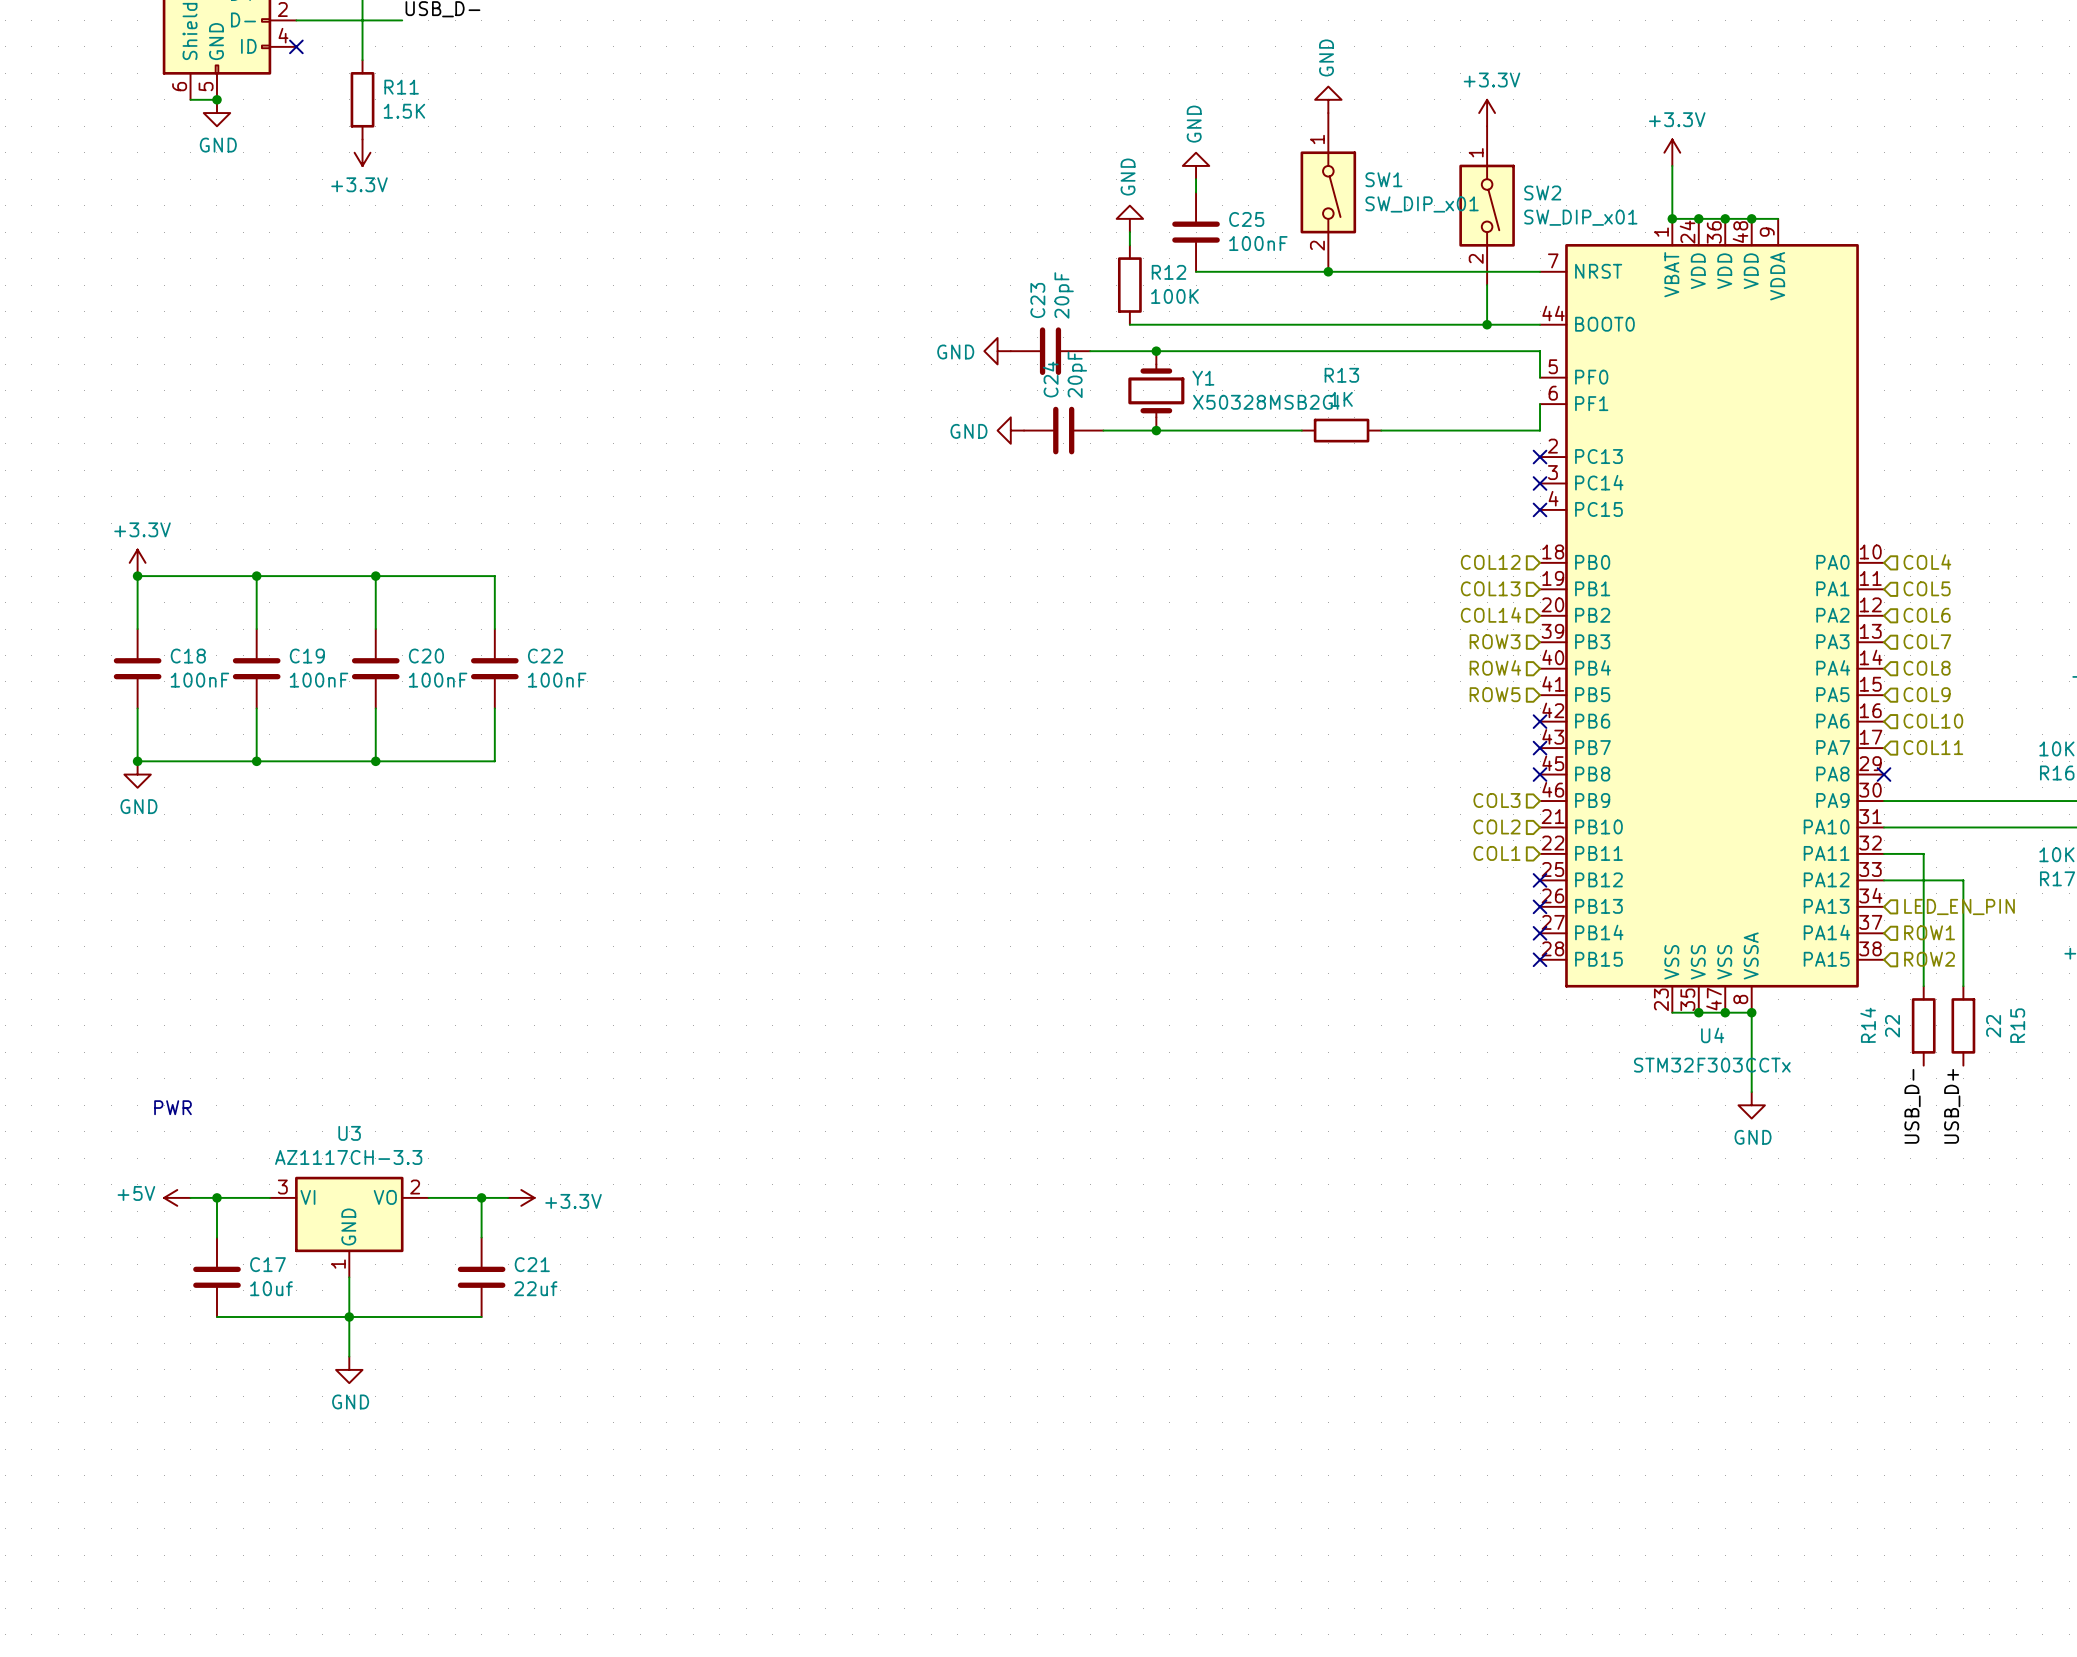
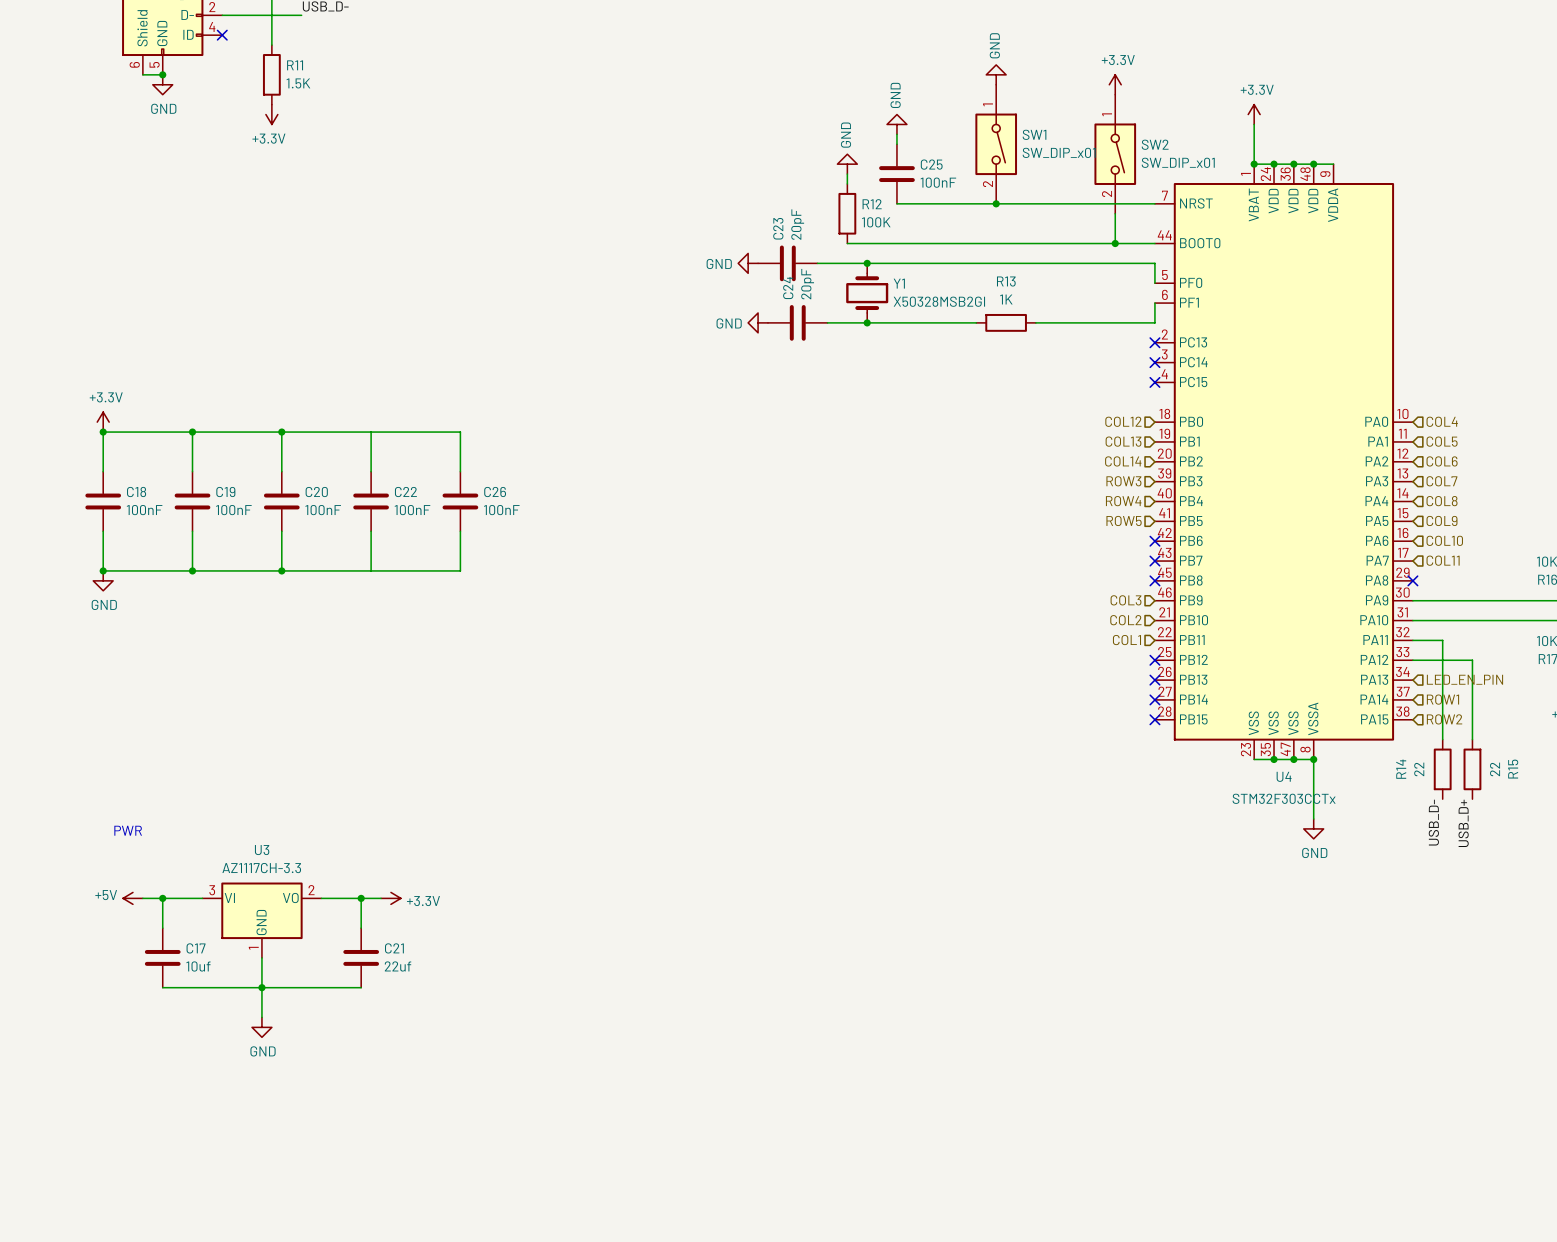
wire: none -> (371, 432) (460, 432) (460, 471)
C26: none -> 100nF (460, 501)
wire: none -> (460, 531) (460, 570) (371, 570)

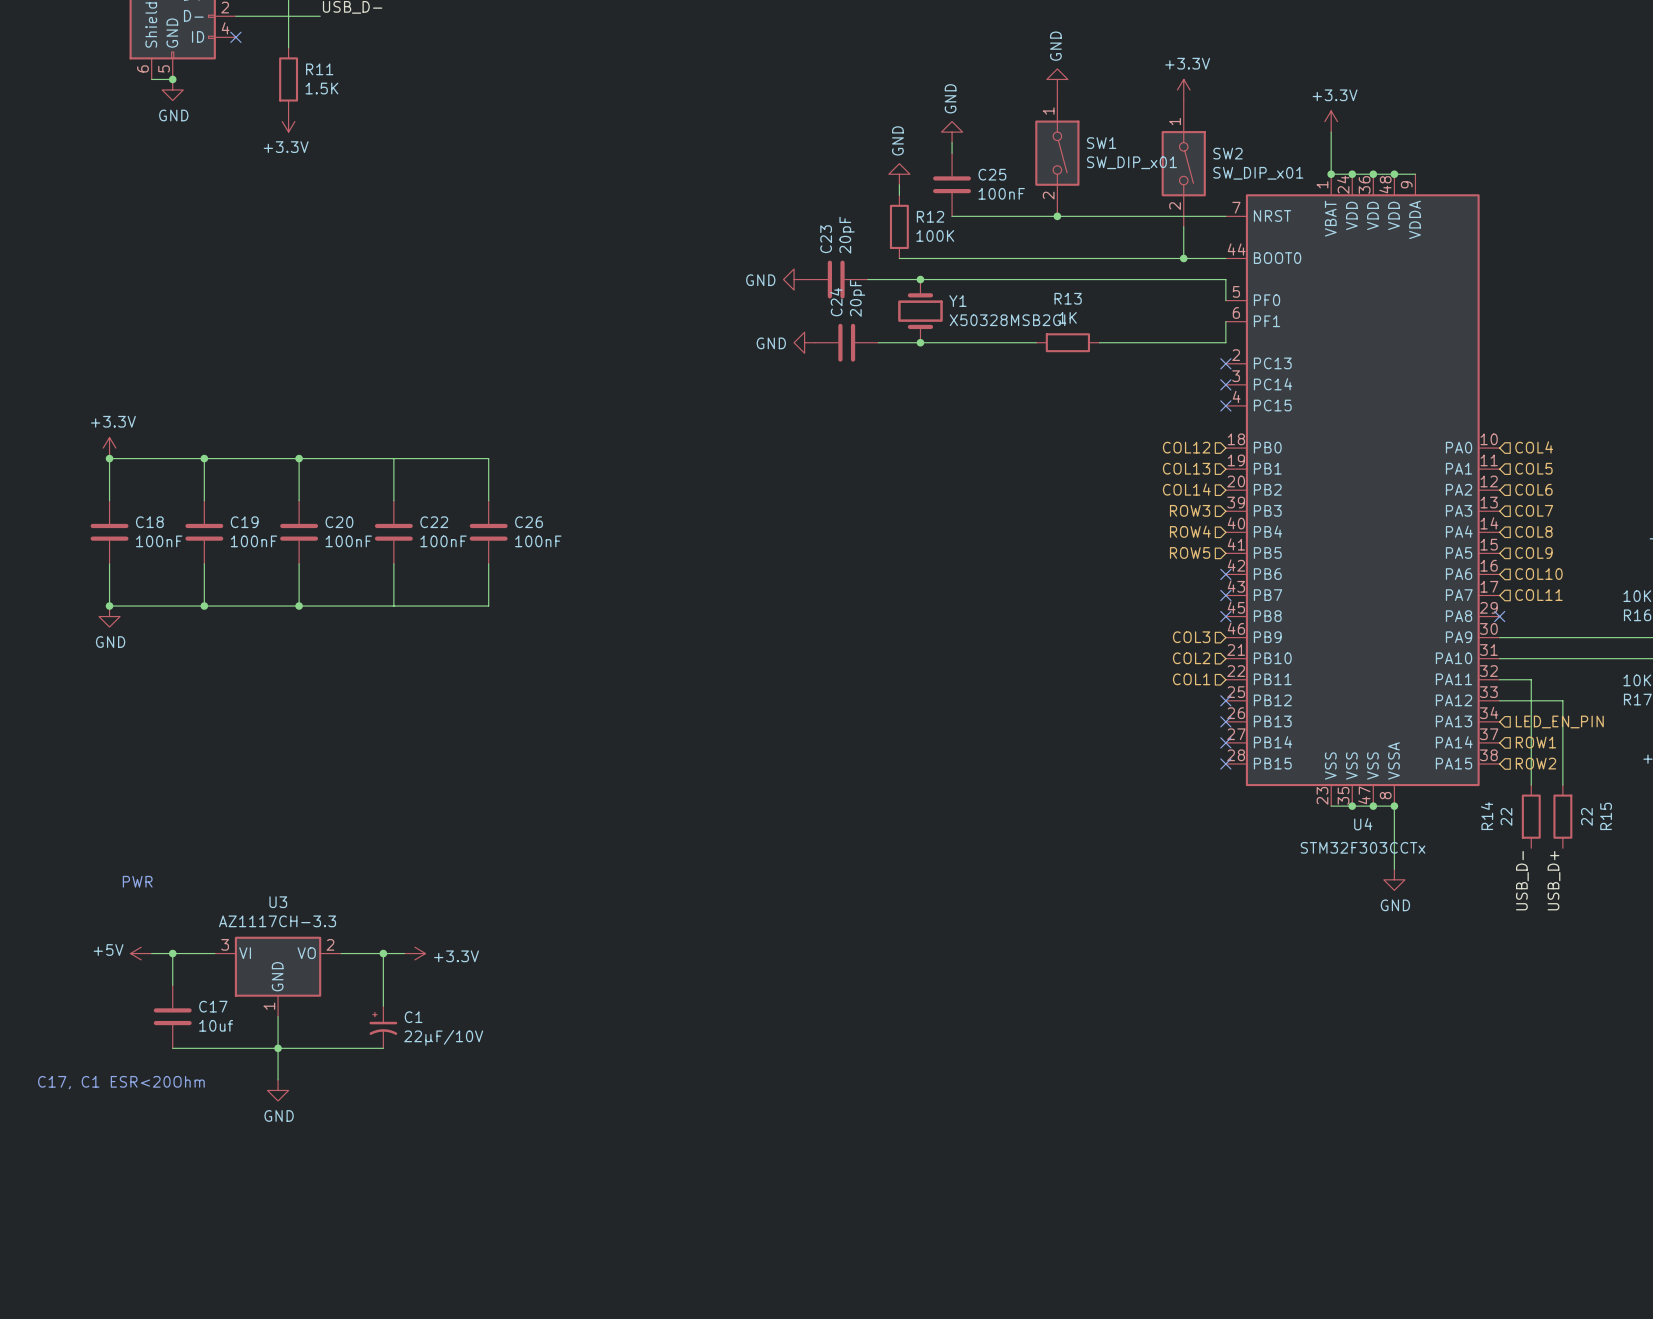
C21: 22uf (361, 957) -> none
C1: none -> 22μF/10V (383, 1027)
text: none -> C17, C1 ESR<20Ohm (121, 1082)

